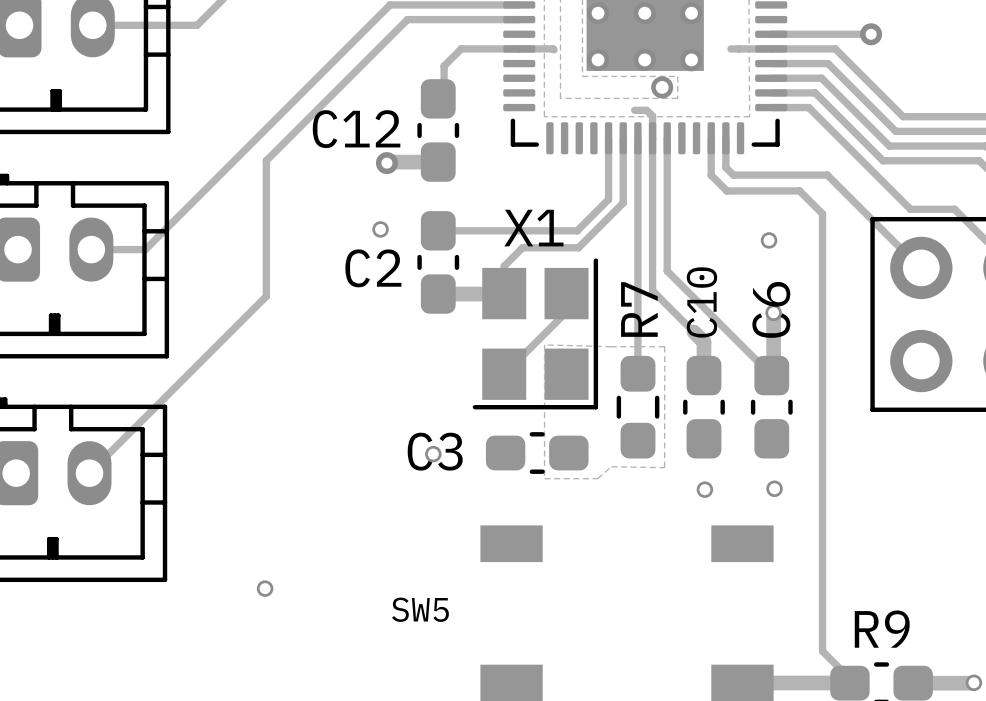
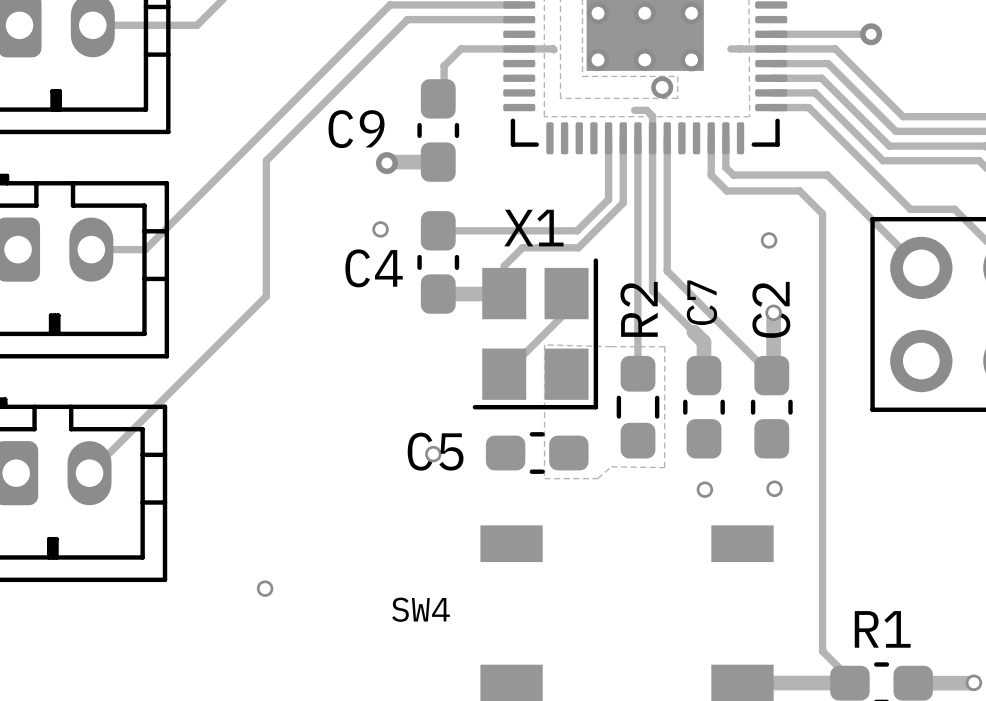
C12 name: C12 (356, 129) -> C9 (356, 129)
C2 name: C2 (373, 268) -> C4 (374, 268)
C10 name: C10 (701, 302) -> C7 (701, 302)
R7 name: R7 (639, 309) -> R2 (639, 309)
C6 name: C6 (771, 309) -> C2 (771, 309)
C3 name: C3 (435, 451) -> C5 (435, 451)
SW5 name: SW5 (420, 609) -> SW4 (420, 609)
R9 name: R9 (882, 629) -> R1 (882, 629)

